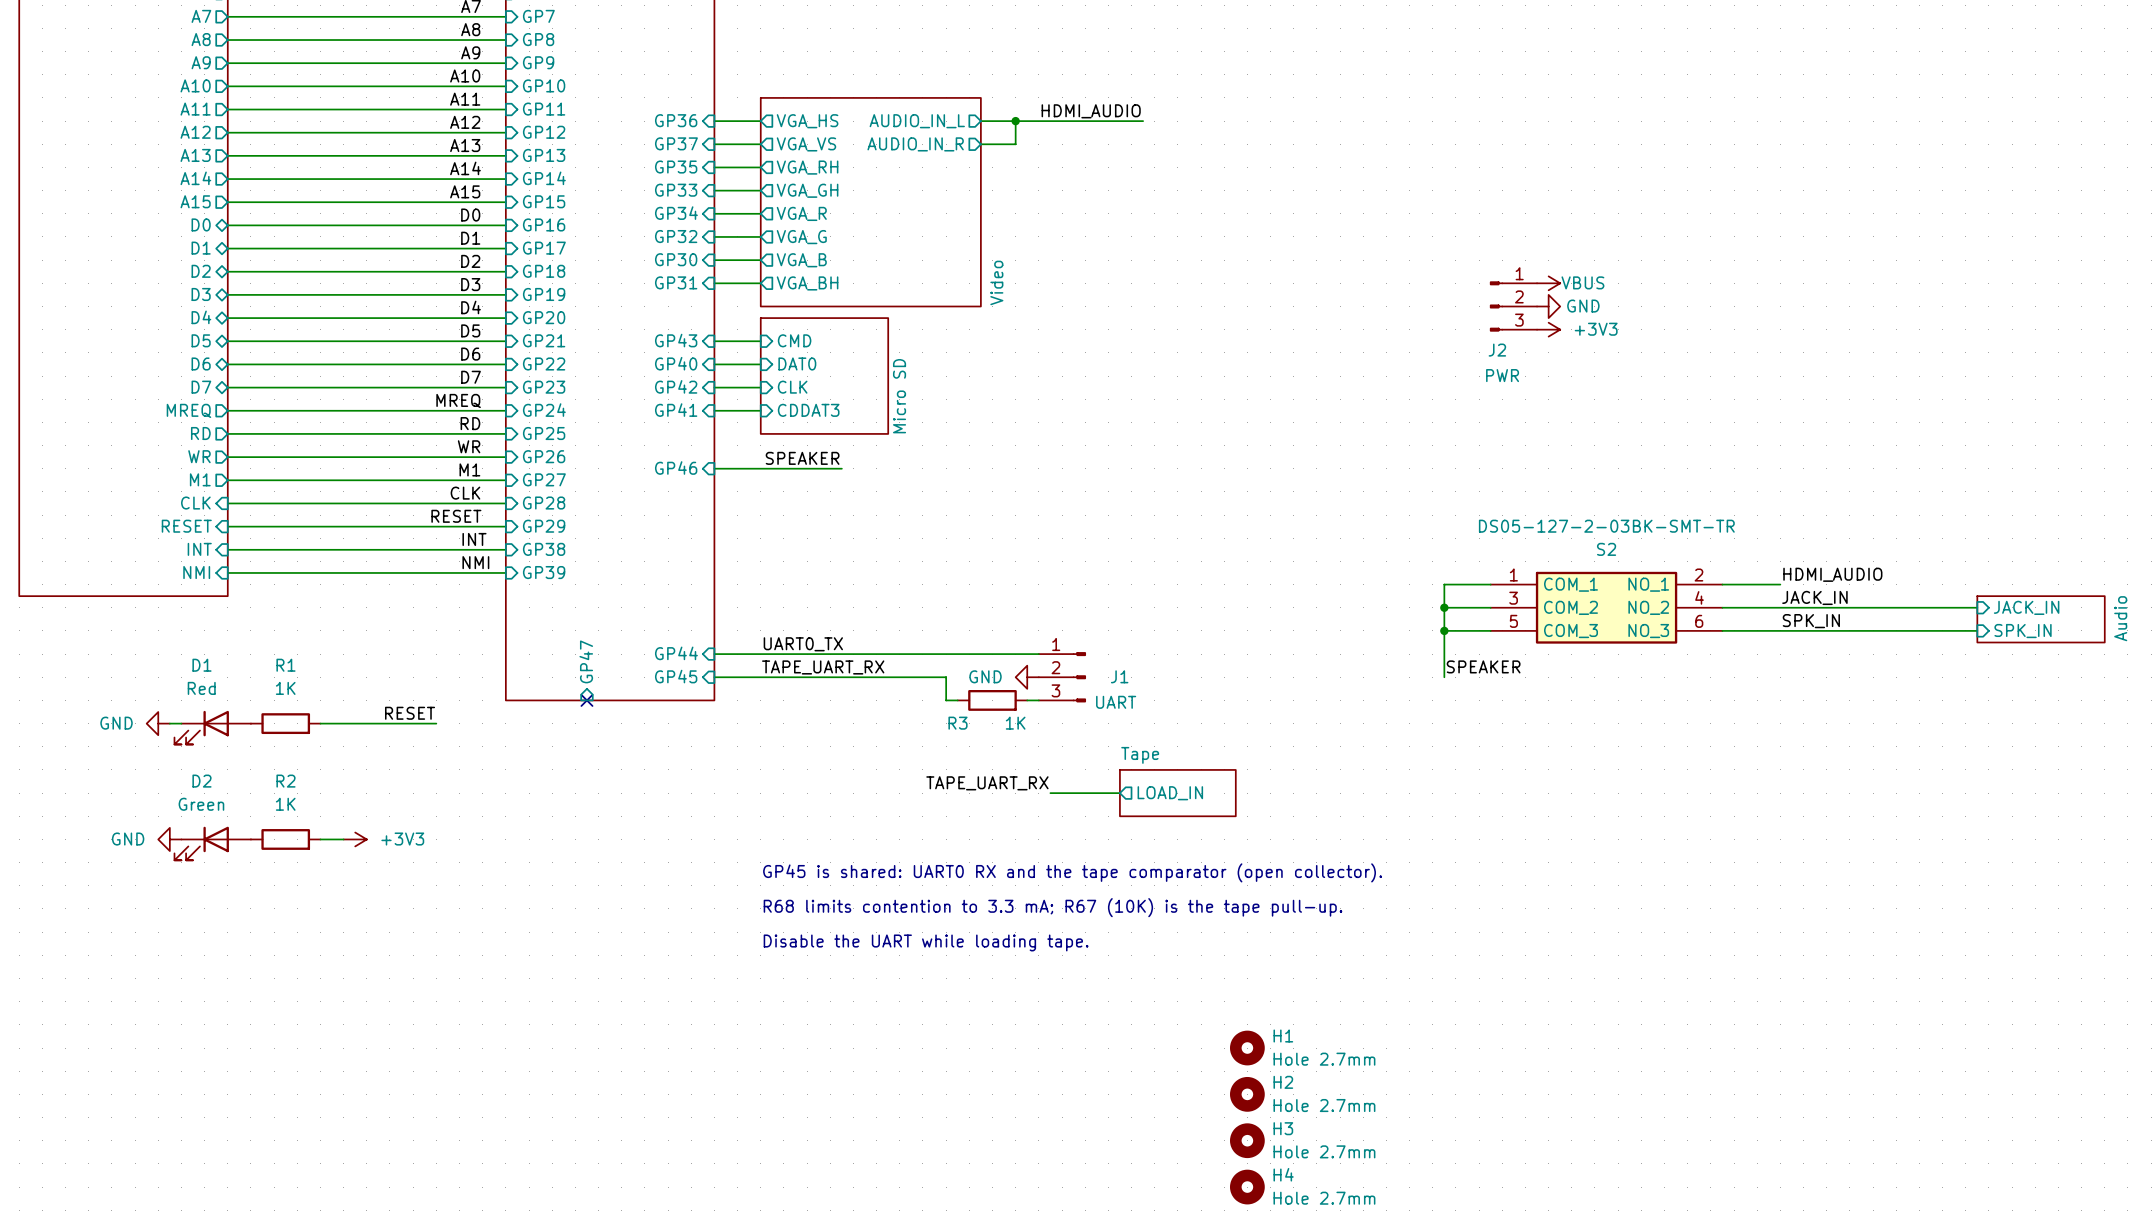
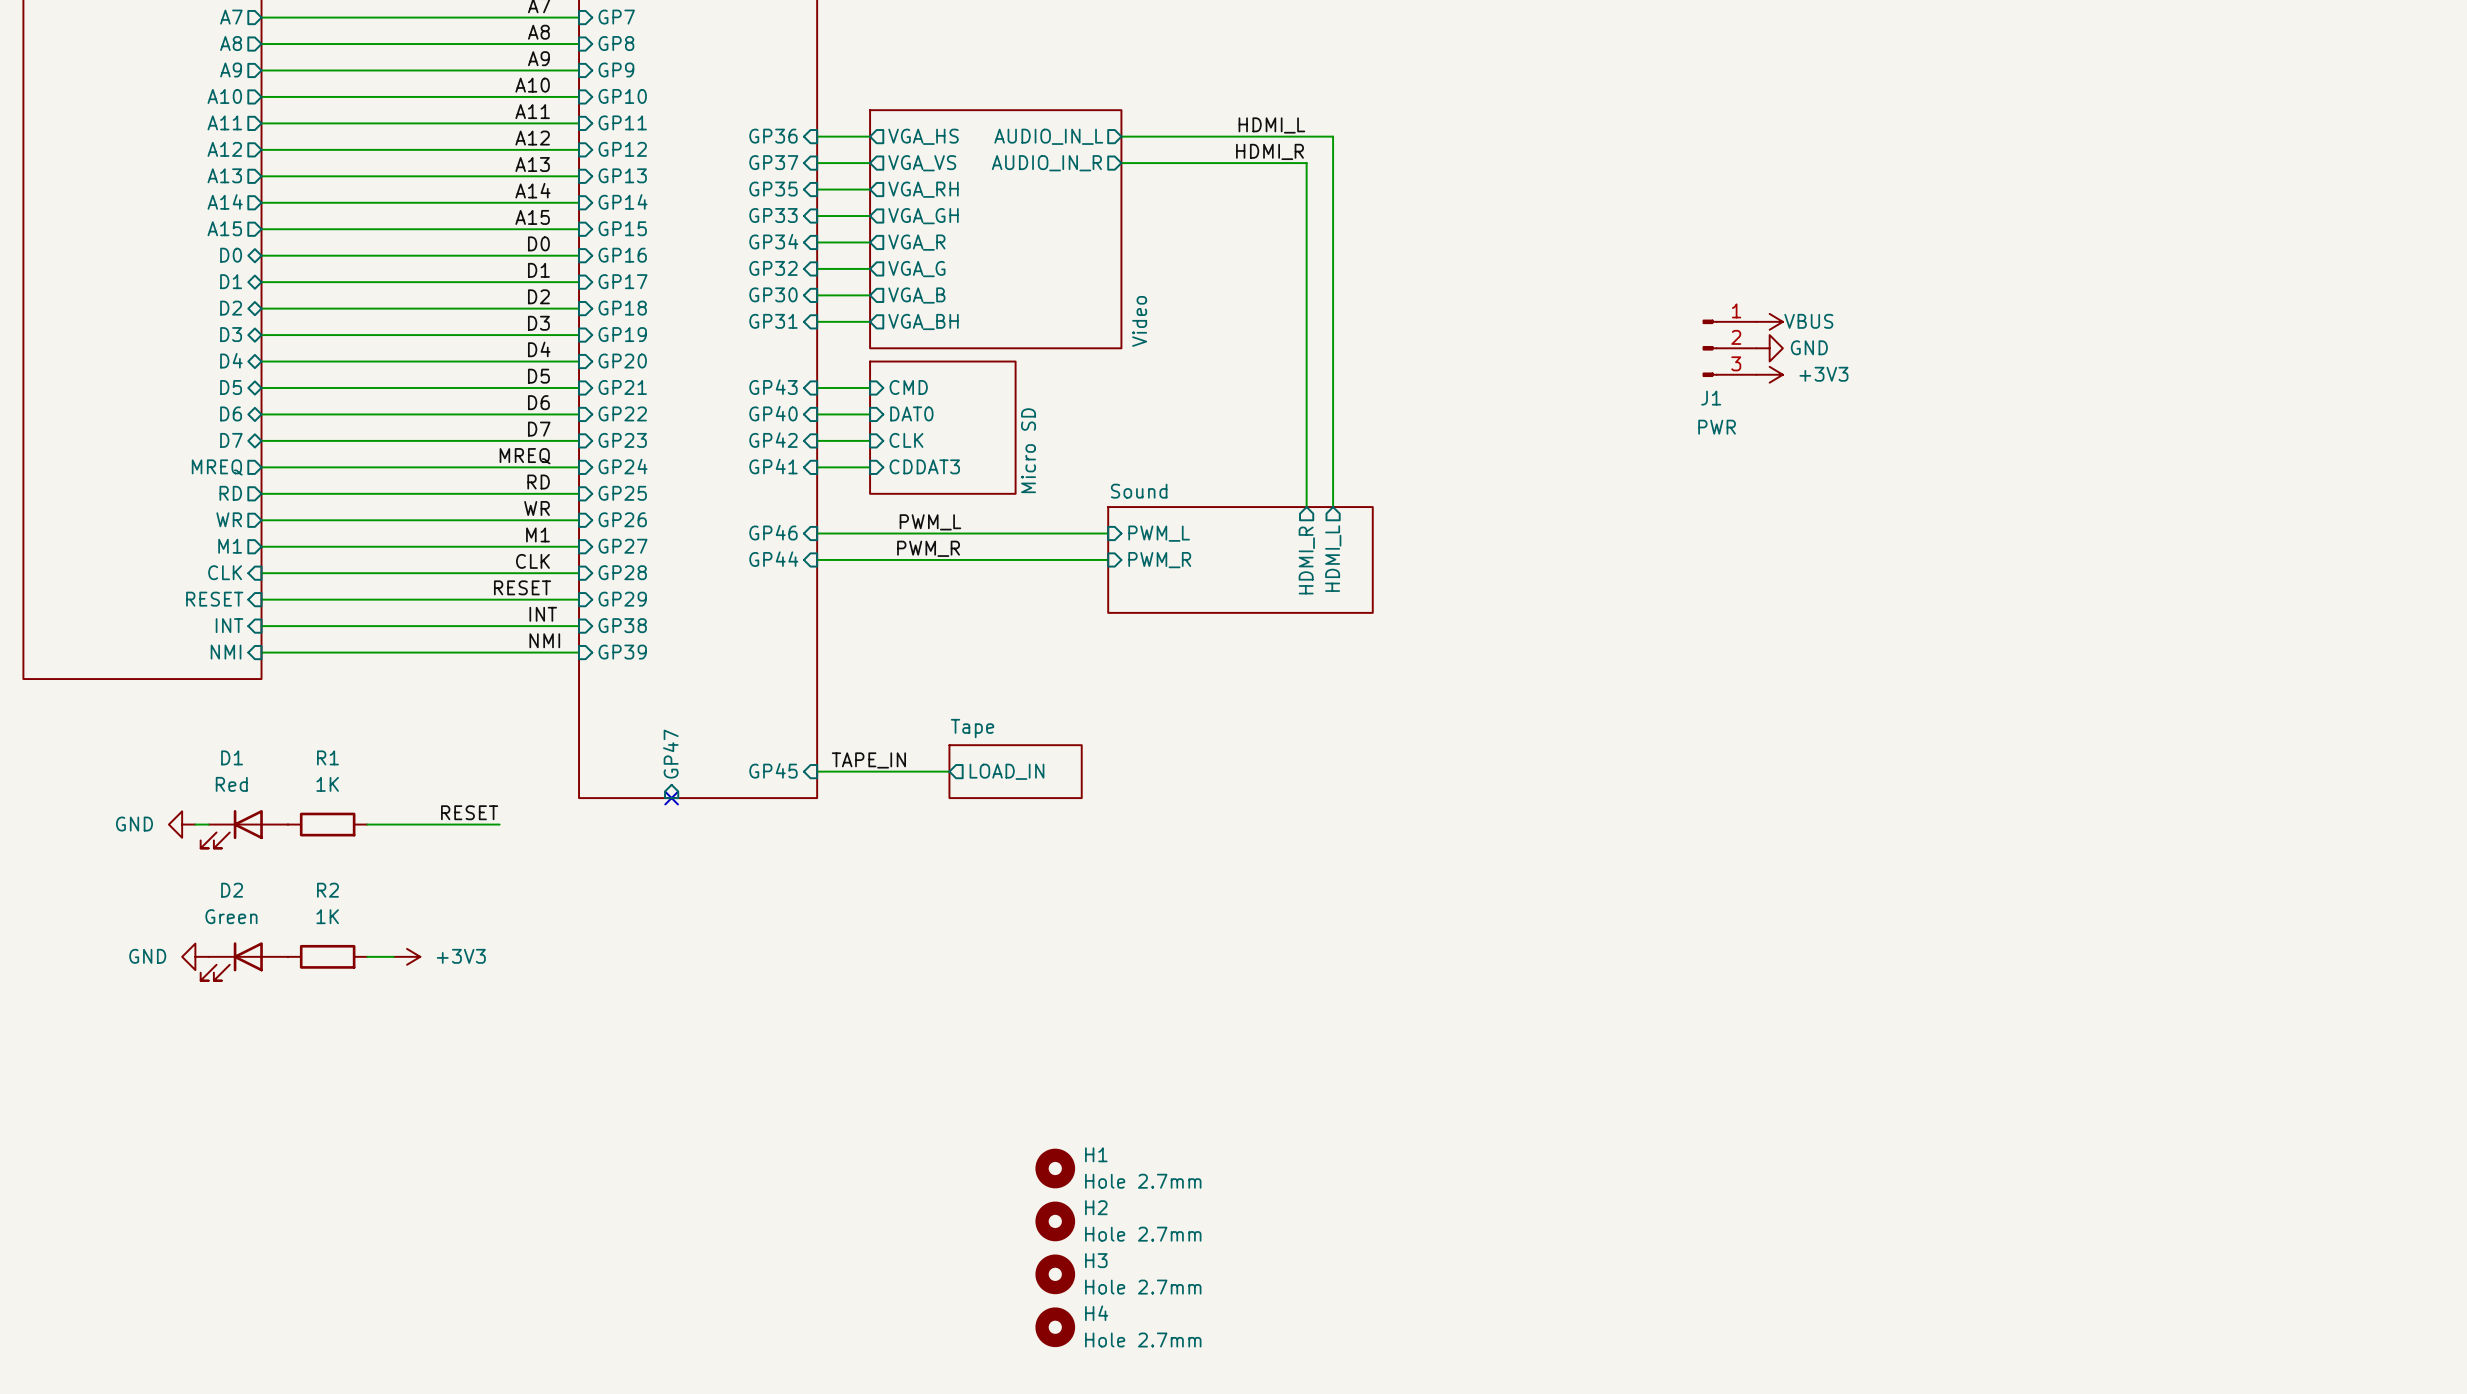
label: HDMI_AUDIO (1091, 111) -> HDMI_L (1271, 125)
wire: (1015, 121) (1015, 144) -> (1306, 507) (1306, 163) (1161, 163)
junction: (1015, 121) -> none
wire: none -> (1306, 136) (1333, 136) (1333, 507)
label: none -> HDMI_R (1270, 151)
J2 name: J2 (1497, 350) -> J1 (1711, 398)
label: SPEAKER (802, 458) -> PWM_L (930, 522)
wire: none -> (962, 533) (1108, 533)
sheet pin: none -> PWM_L (1159, 533)
label: none -> PWM_R (928, 548)
sheet pin: none -> HDMI_L (1333, 558)
wire: none -> (817, 559) (1108, 559)
sheet pin: none -> PWM_R (1159, 560)
sheet Sound: none -> (1240, 559)
sheet pin: none -> HDMI_R (1306, 560)
label: HDMI_AUDIO (1832, 574) -> none
wire: (1490, 584) (1444, 584) (1444, 677) -> none
wire: (1722, 584) (1780, 584) -> none
label: JACK_IN (1814, 597) -> none
wire: (1444, 607) (1490, 607) -> none
junction: (1444, 607) -> none
S2: DS05-127-2-03BK-SMT-TR (1606, 607) -> none
wire: (1722, 607) (1977, 607) -> none
sheet pin: JACK_IN (2026, 607) -> none
sheet Audio: (2041, 619) -> none
label: SPK_IN (1811, 621) -> none
wire: (1444, 630) (1490, 630) -> none
junction: (1444, 630) -> none
wire: (1722, 630) (1977, 630) -> none
sheet pin: SPK_IN (2023, 631) -> none
label: UART0_TX (803, 644) -> none
sheet pin position: GP44 (676, 653) -> GP44 (773, 559)
wire: (714, 654) (1038, 654) -> none
label: SPEAKER (1483, 666) -> none
label: none -> TAPE_IN (868, 760)
label: TAPE_UART_RX (823, 667) -> none
wire: (830, 677) (946, 677) (946, 700) (957, 700) -> none
sheet pin: none -> LOAD_IN (1006, 771)
sheet Tape: none -> (1015, 771)
power symbol: GND (1027, 677) -> none
J1: UART (1062, 677) -> none
R3: 1K (992, 700) -> none
wire: (1027, 700) (1038, 700) -> none
label: TAPE_UART_RX (987, 783) -> none
wire: (1050, 793) (1119, 793) -> none
sheet pin: LOAD_IN (1170, 793) -> none
sheet Tape: (1177, 793) -> none
text: GP45 is shared: UART0 RX and the tape comparator (open collector). (1072, 872) -> none
text: R68 limits contention to 3.3 mA; R67 (10K) is the tape pull-up. (1052, 907) -> none
text: Disable the UART while loading tape. (926, 942) -> none
H1 position: (1247, 1048) -> (1055, 1168)
H2 position: (1247, 1094) -> (1055, 1221)
H3 position: (1247, 1140) -> (1055, 1274)
H4 position: (1247, 1187) -> (1055, 1327)

